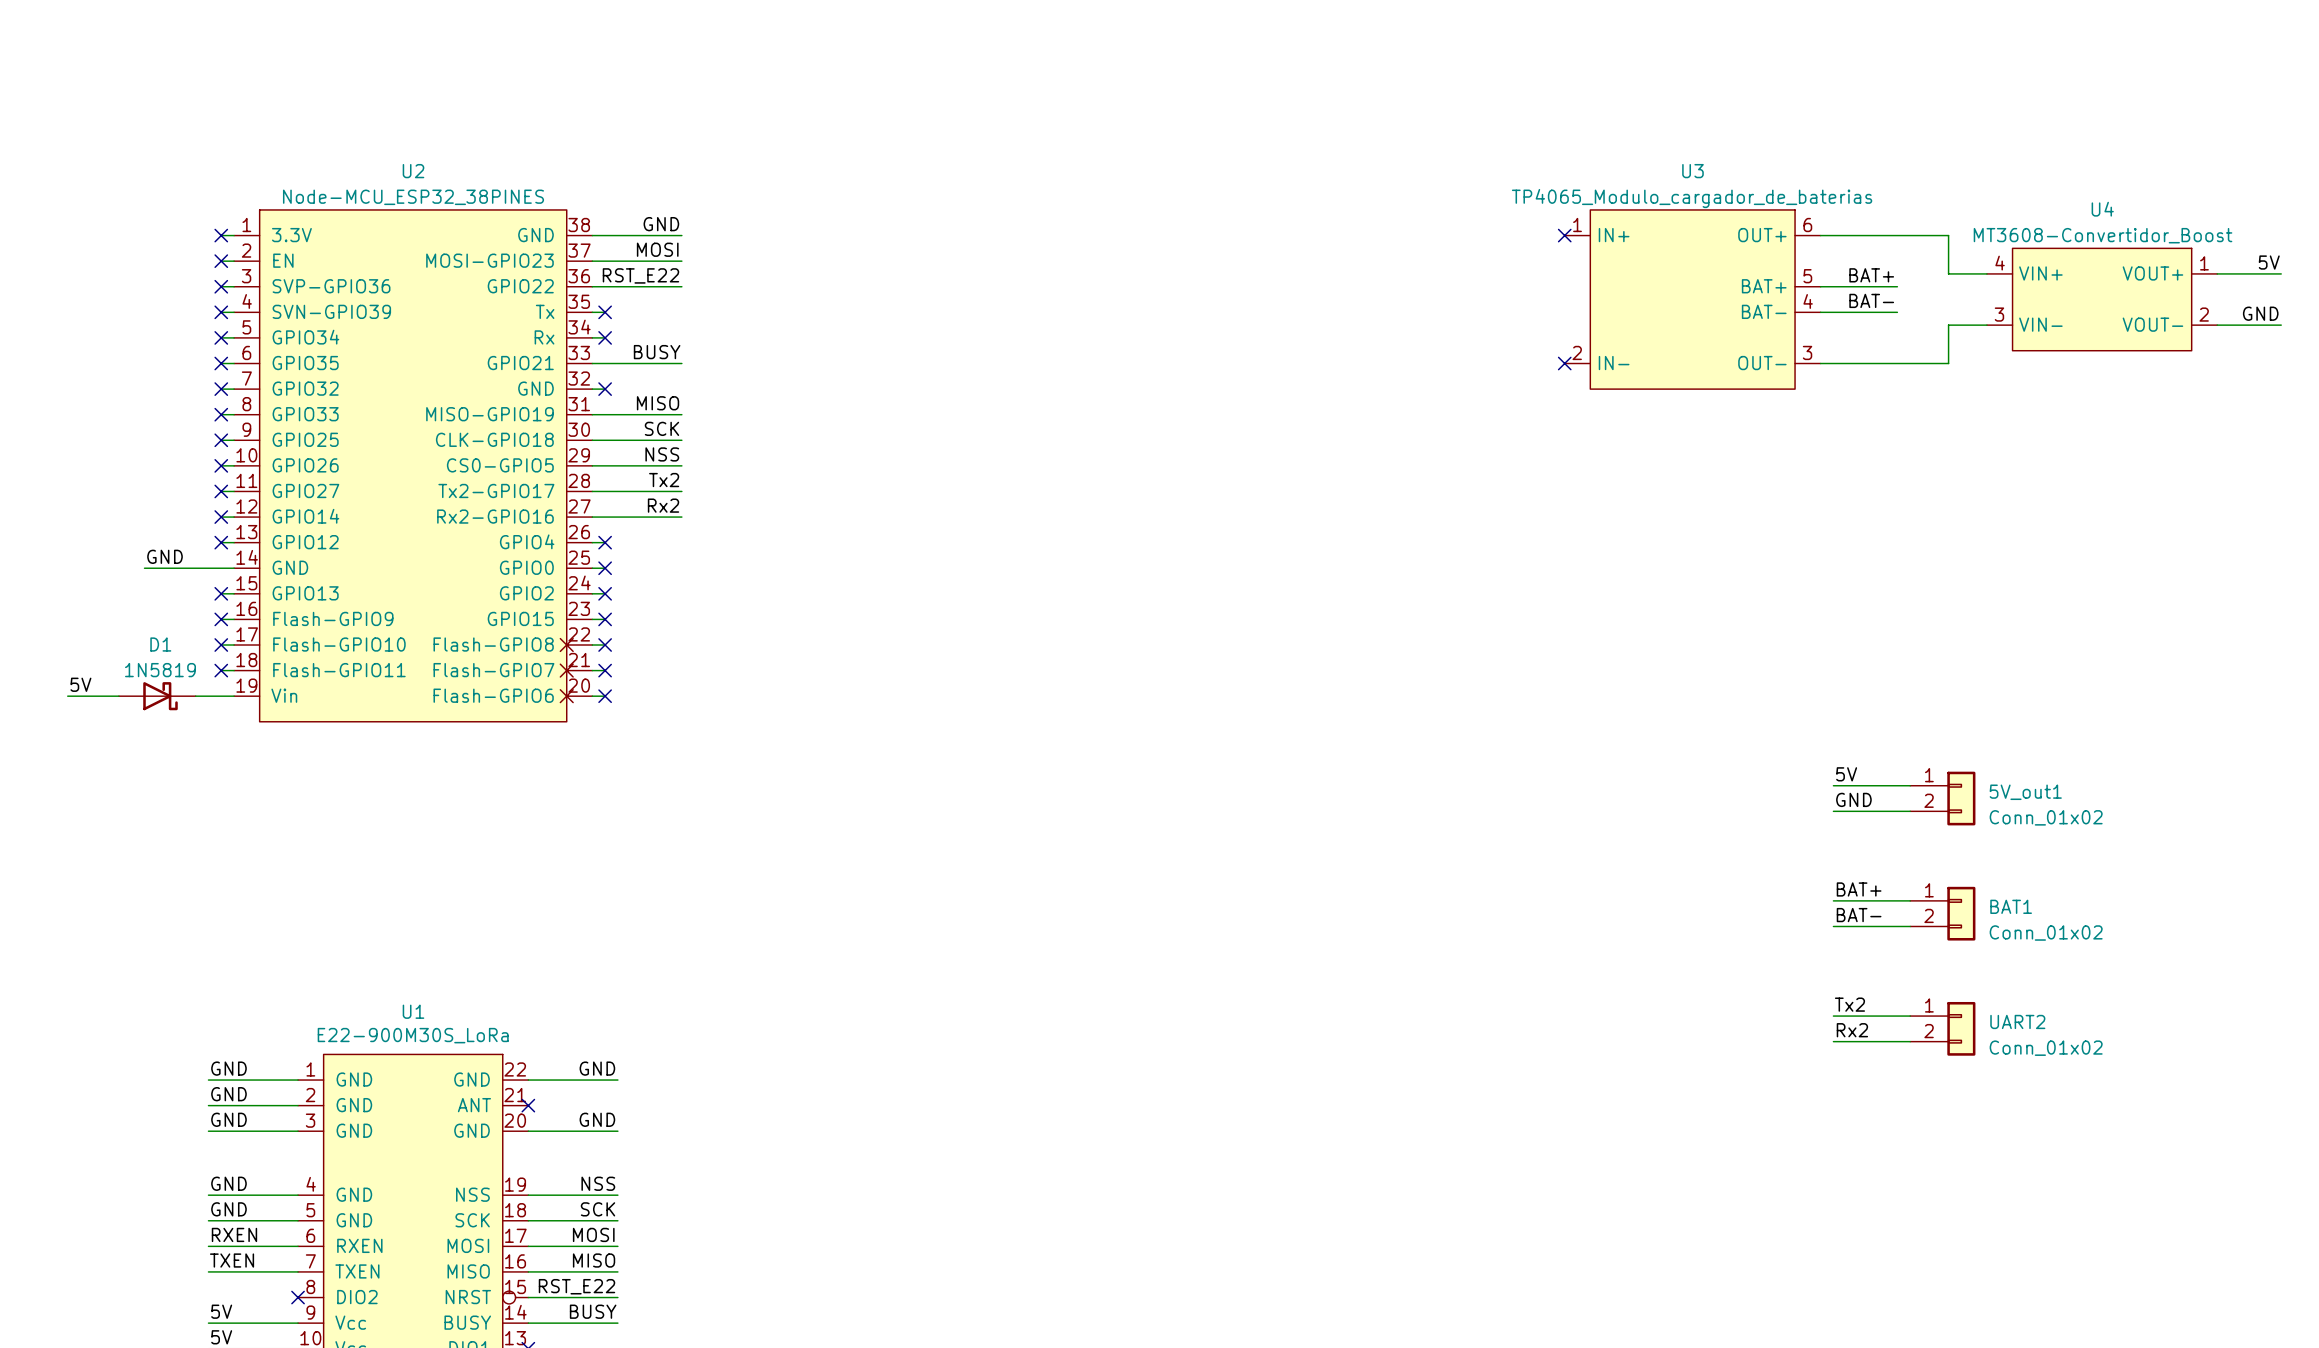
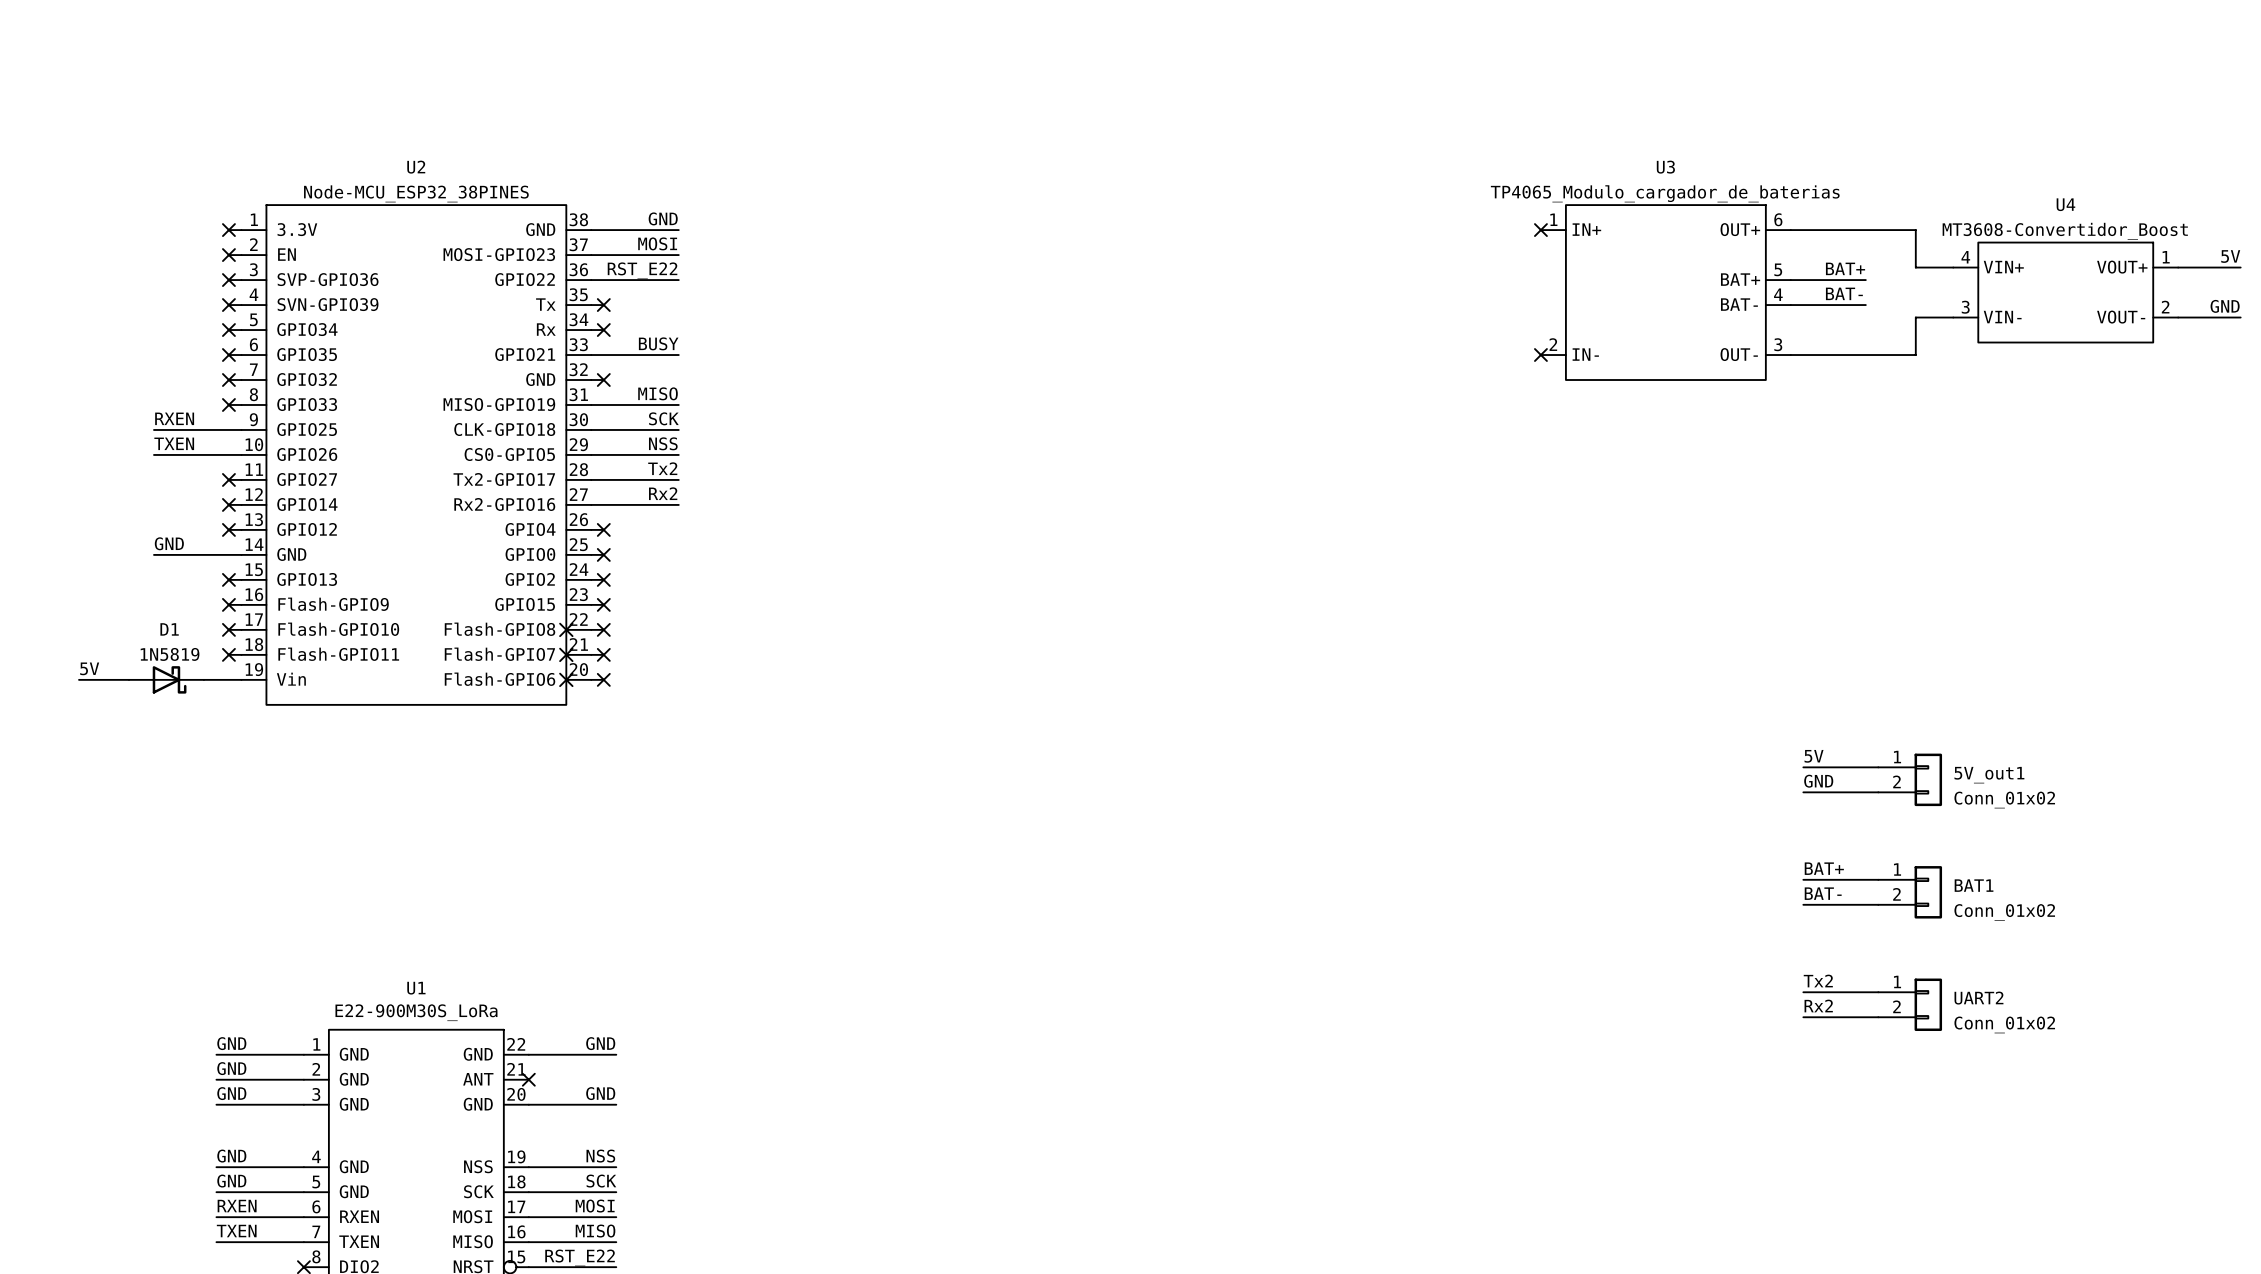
label: none -> RXEN (174, 418)
wire: none -> (153, 429) (228, 429)
no-connect mark: (221, 440) -> none
label: none -> TXEN (174, 443)
wire: none -> (153, 454) (228, 454)
no-connect mark: (221, 465) -> none

